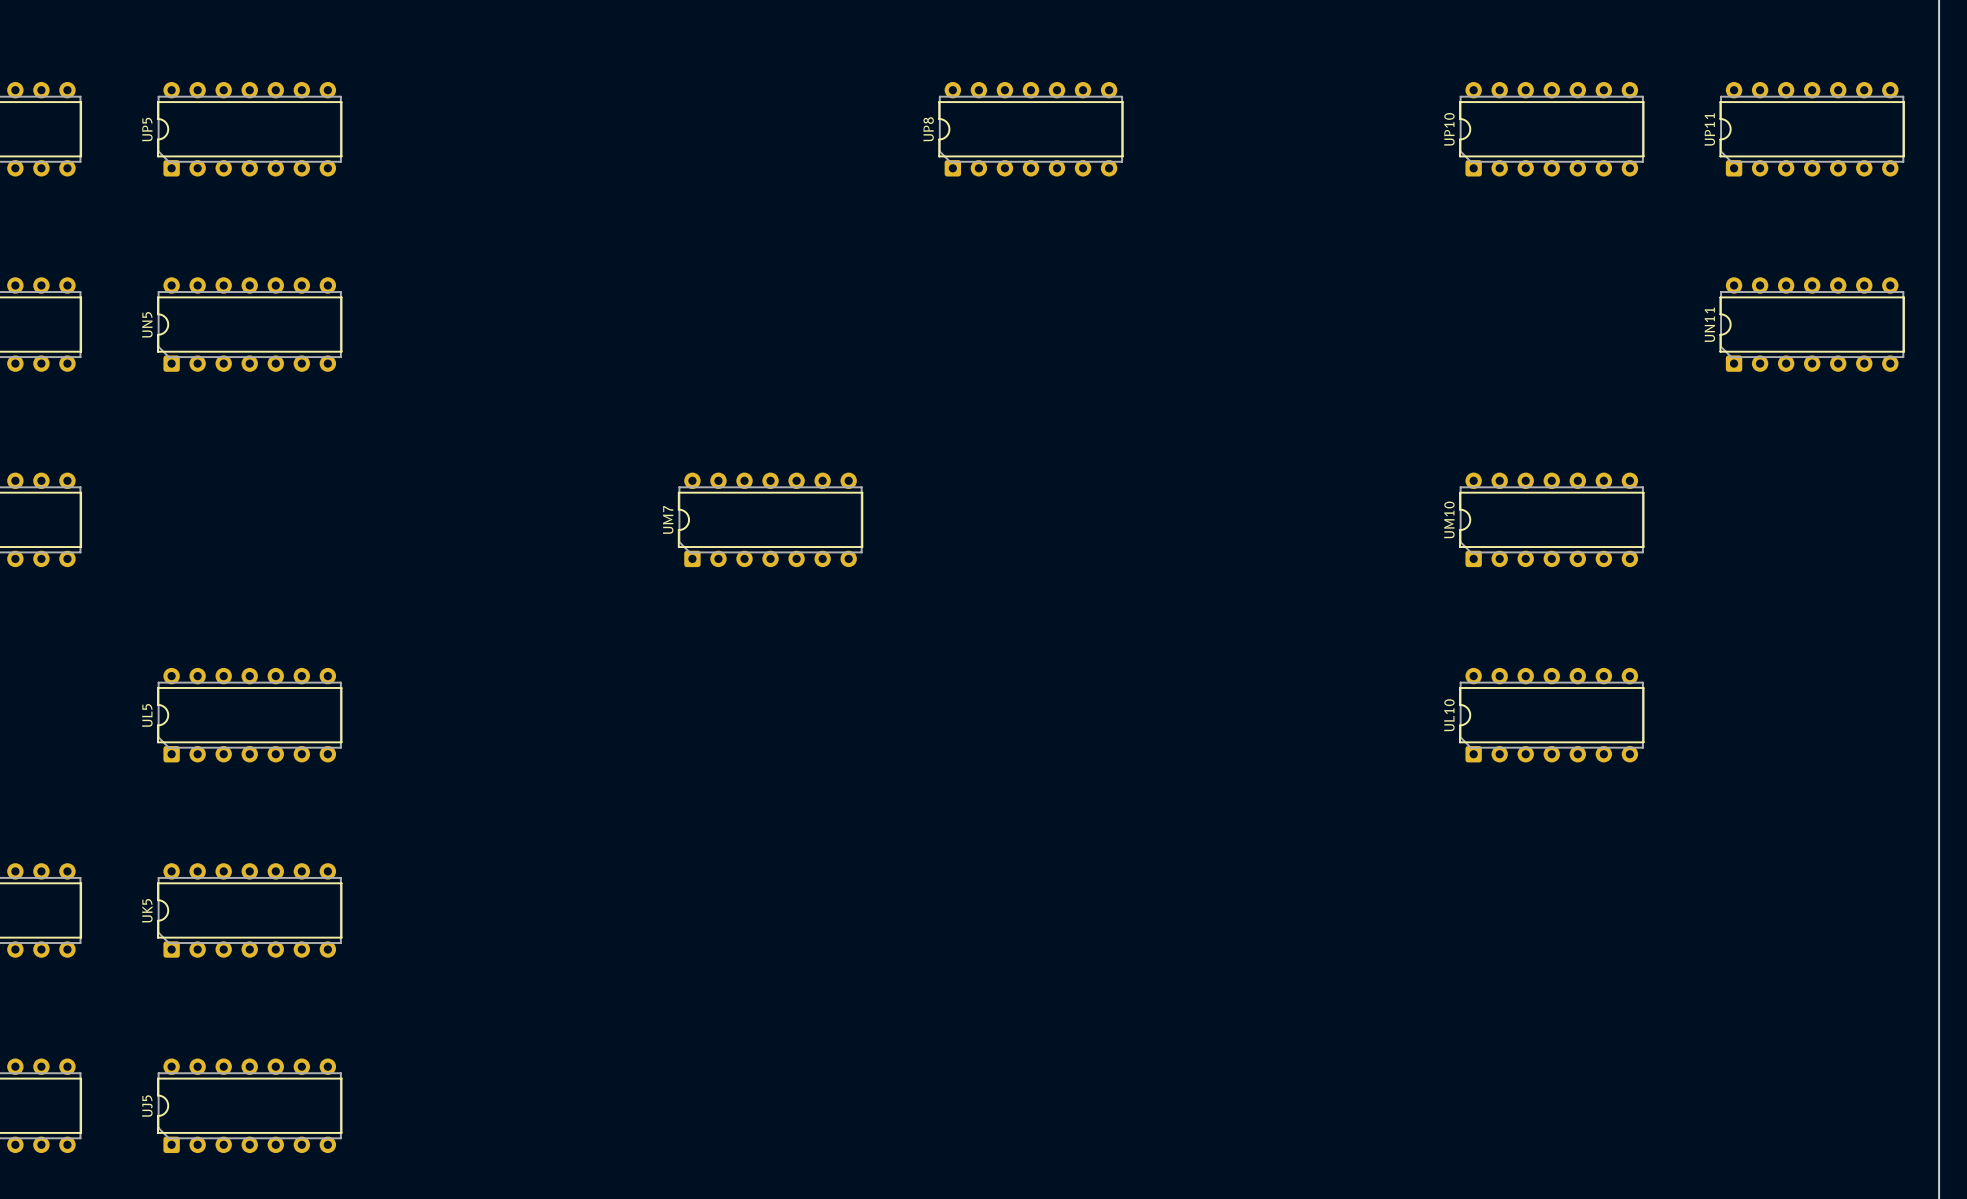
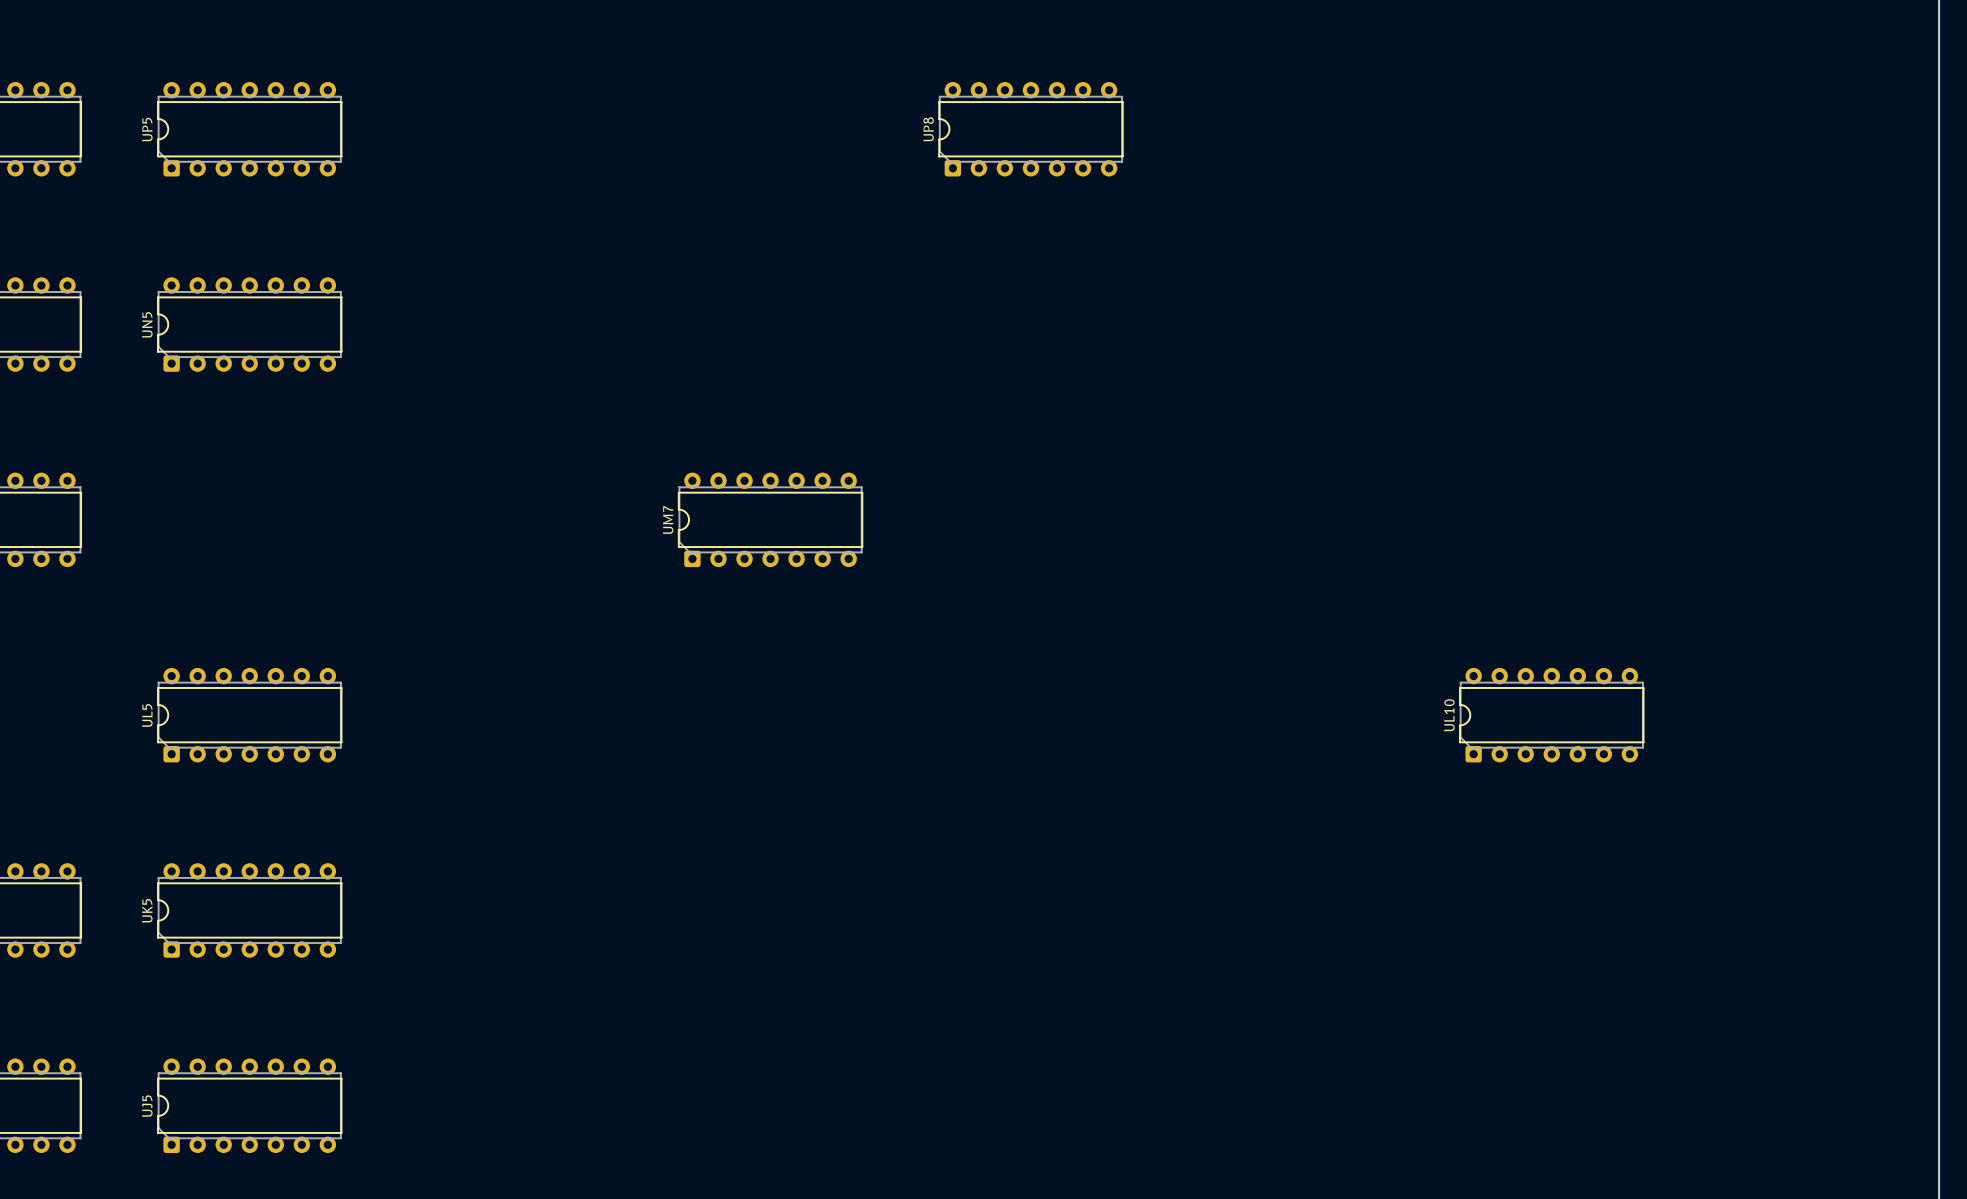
UP10: (1551, 129) -> none
UP11: (1812, 129) -> none
UN11: (1812, 324) -> none
UM10: (1551, 519) -> none

